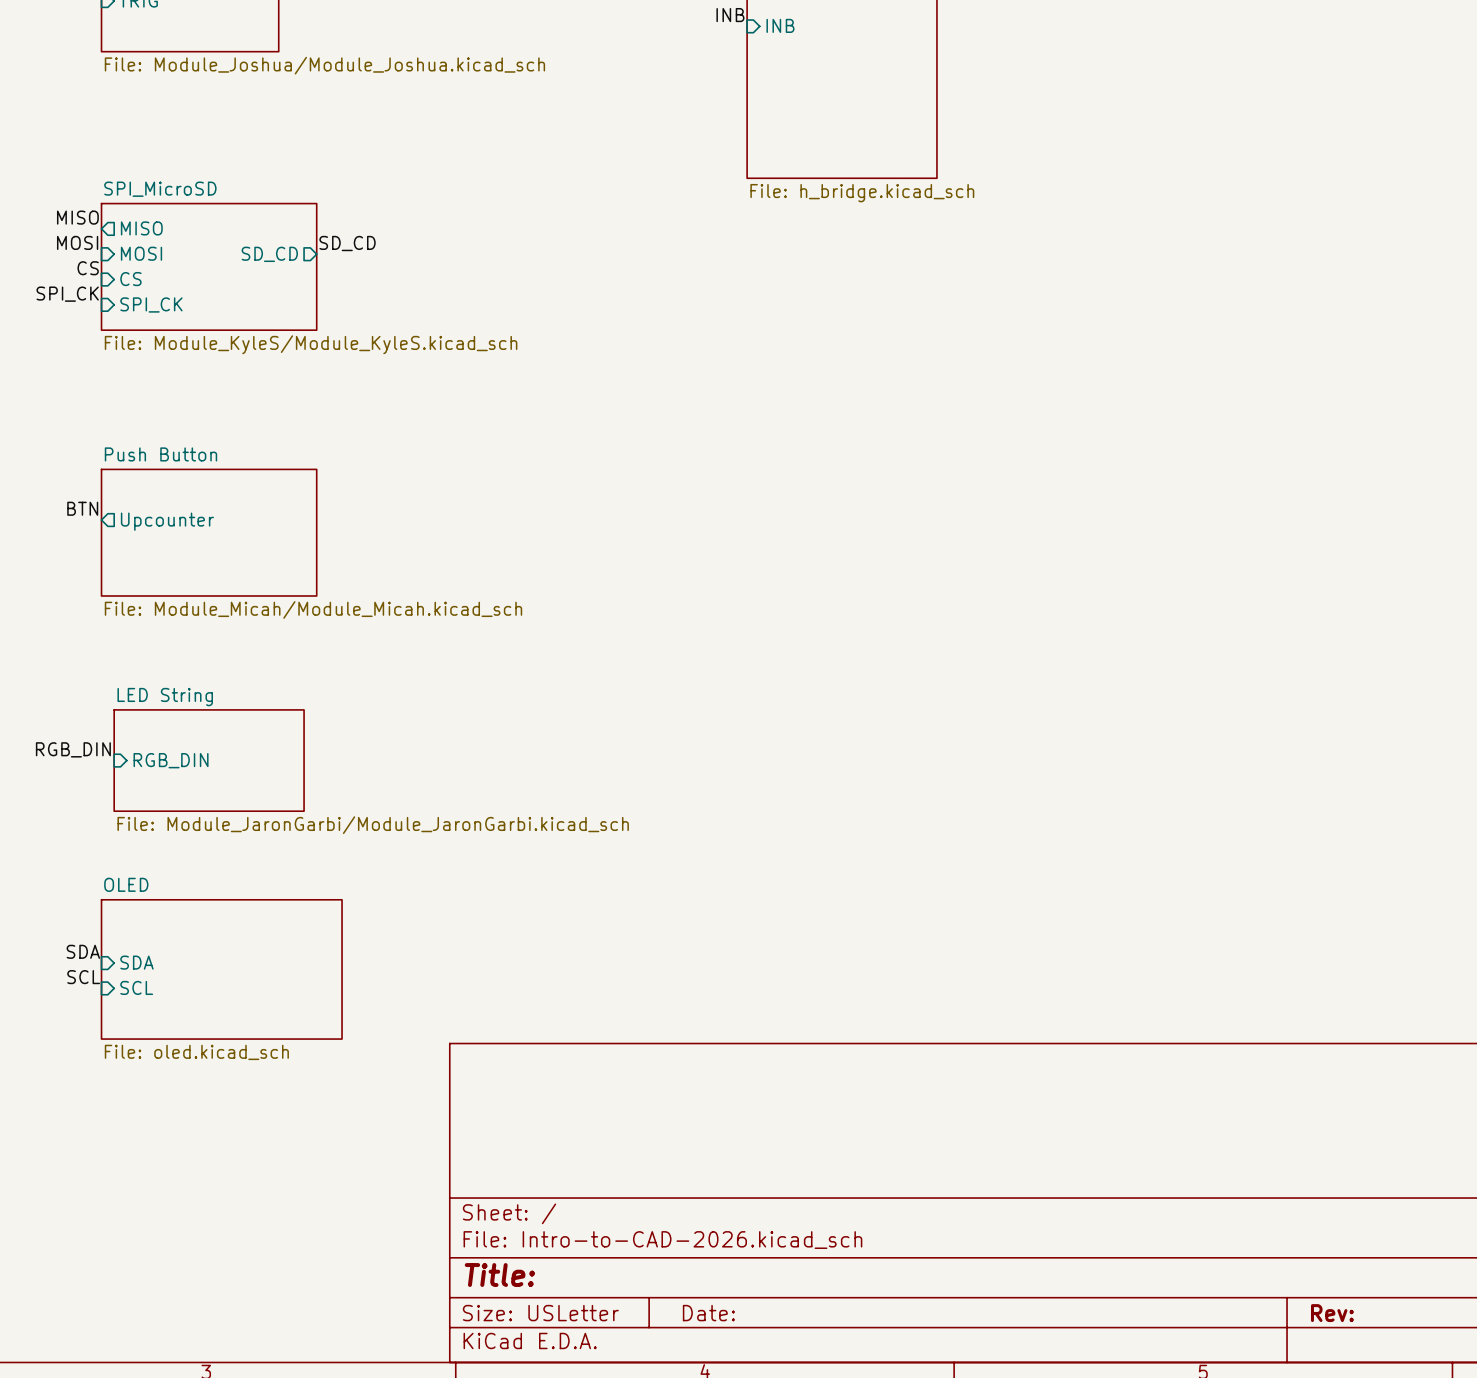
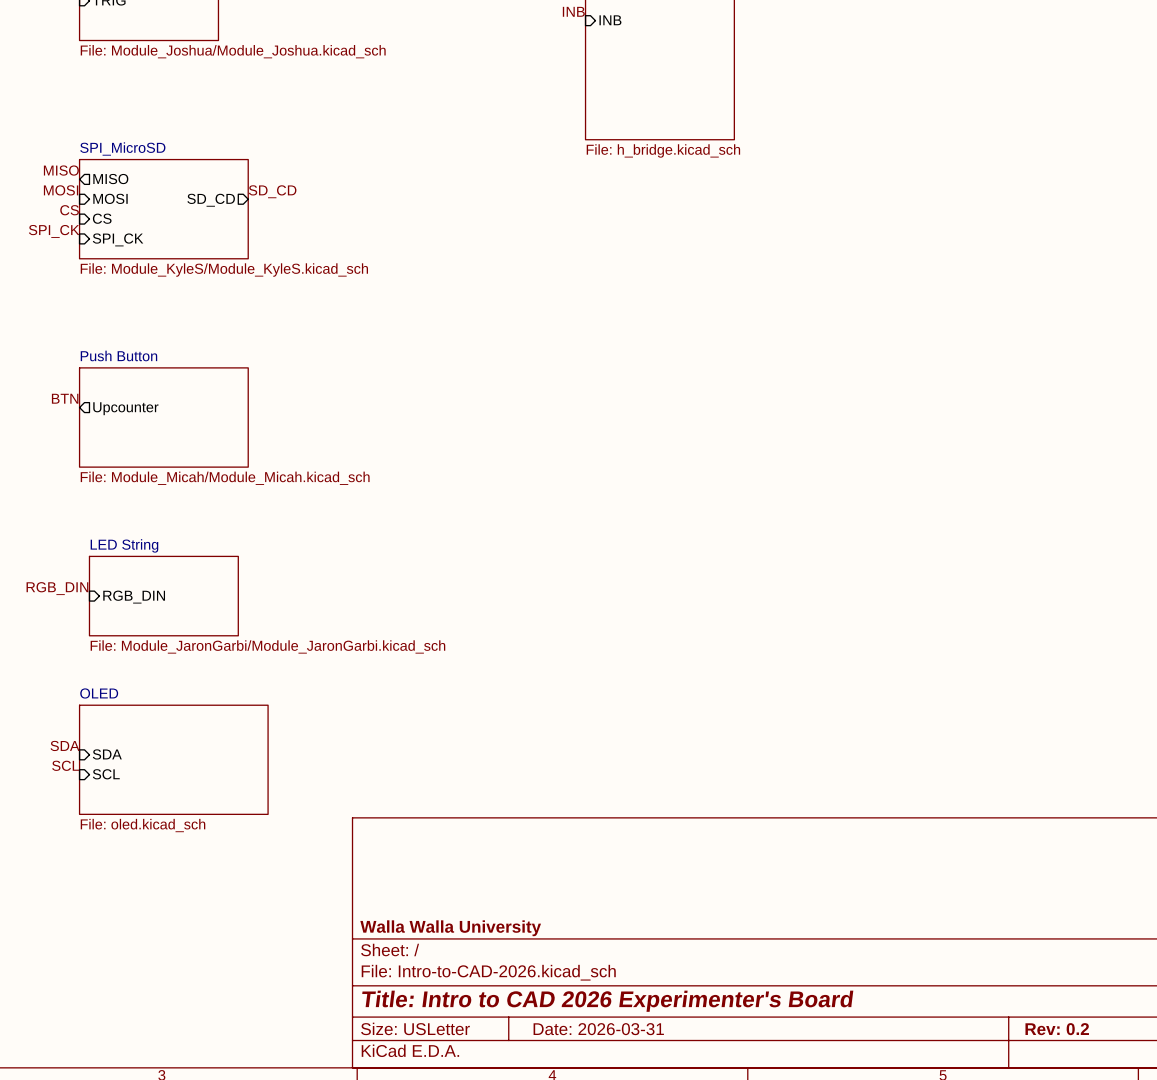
title block: none -> Walla Walla University (450, 928)
title block: Title: (499, 1275) -> Title: Intro to CAD 2026 Experimenter's Board (607, 1001)
title block: Date: (708, 1313) -> Date: 2026-03-31 (598, 1029)
title block: Rev: (1332, 1313) -> Rev: 0.2 (1057, 1029)

